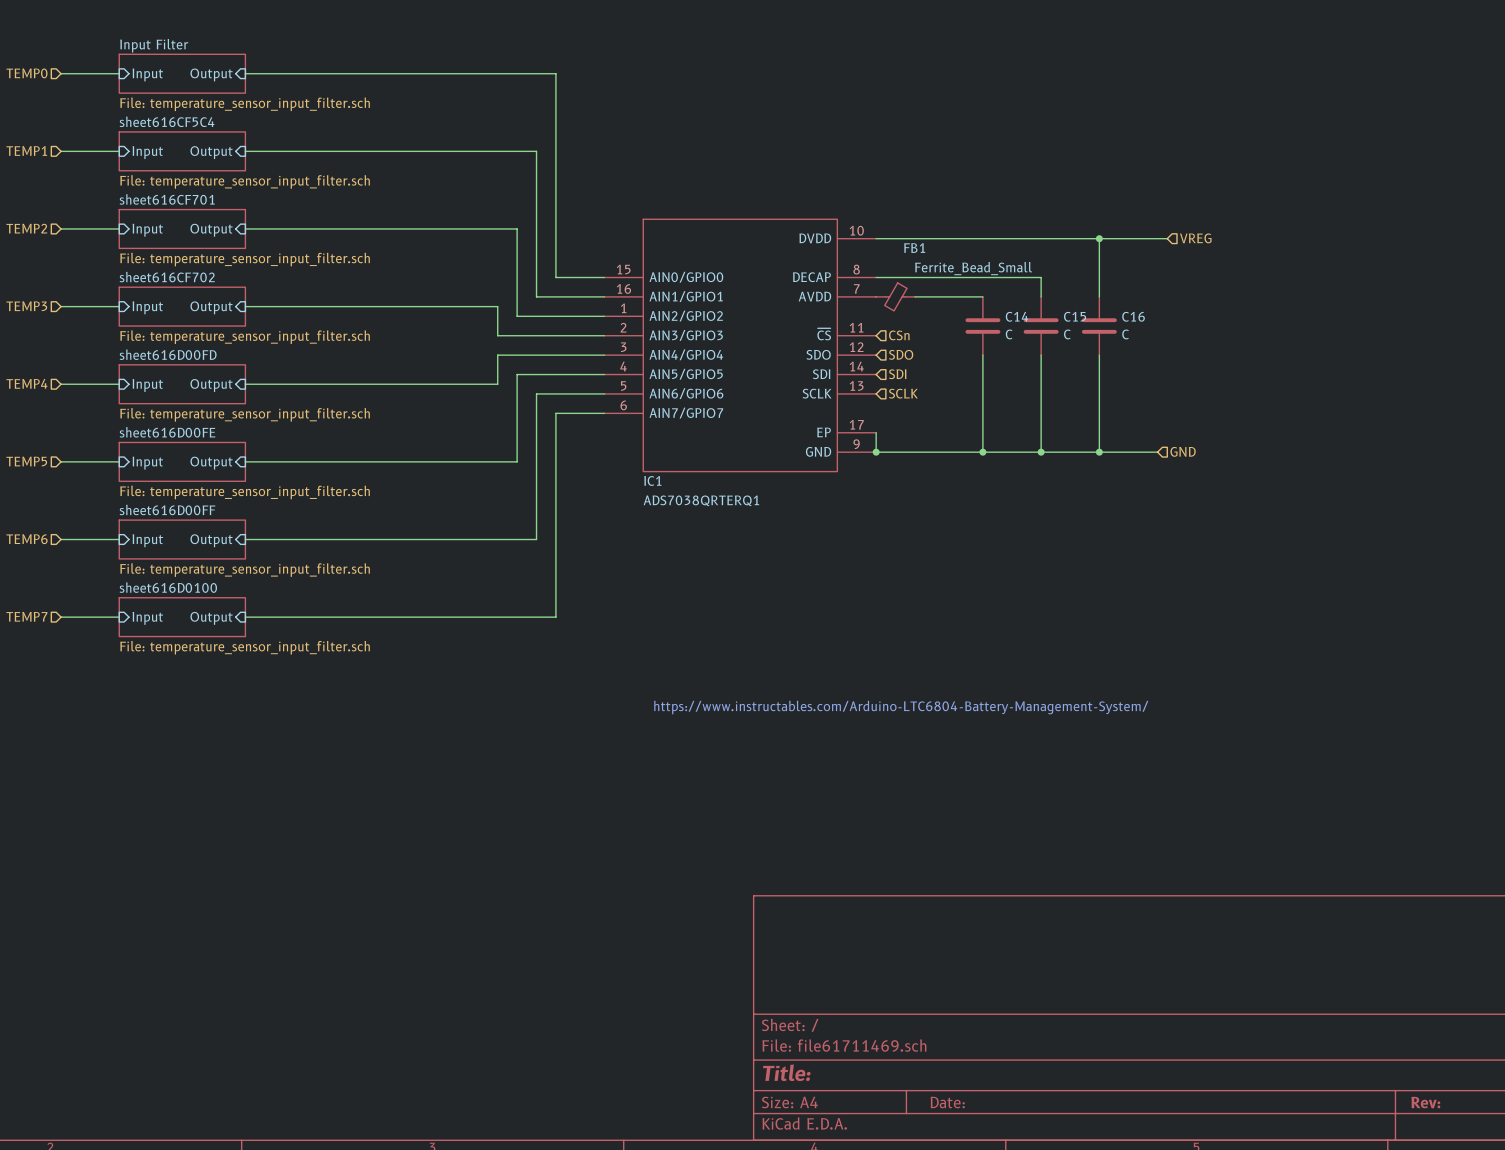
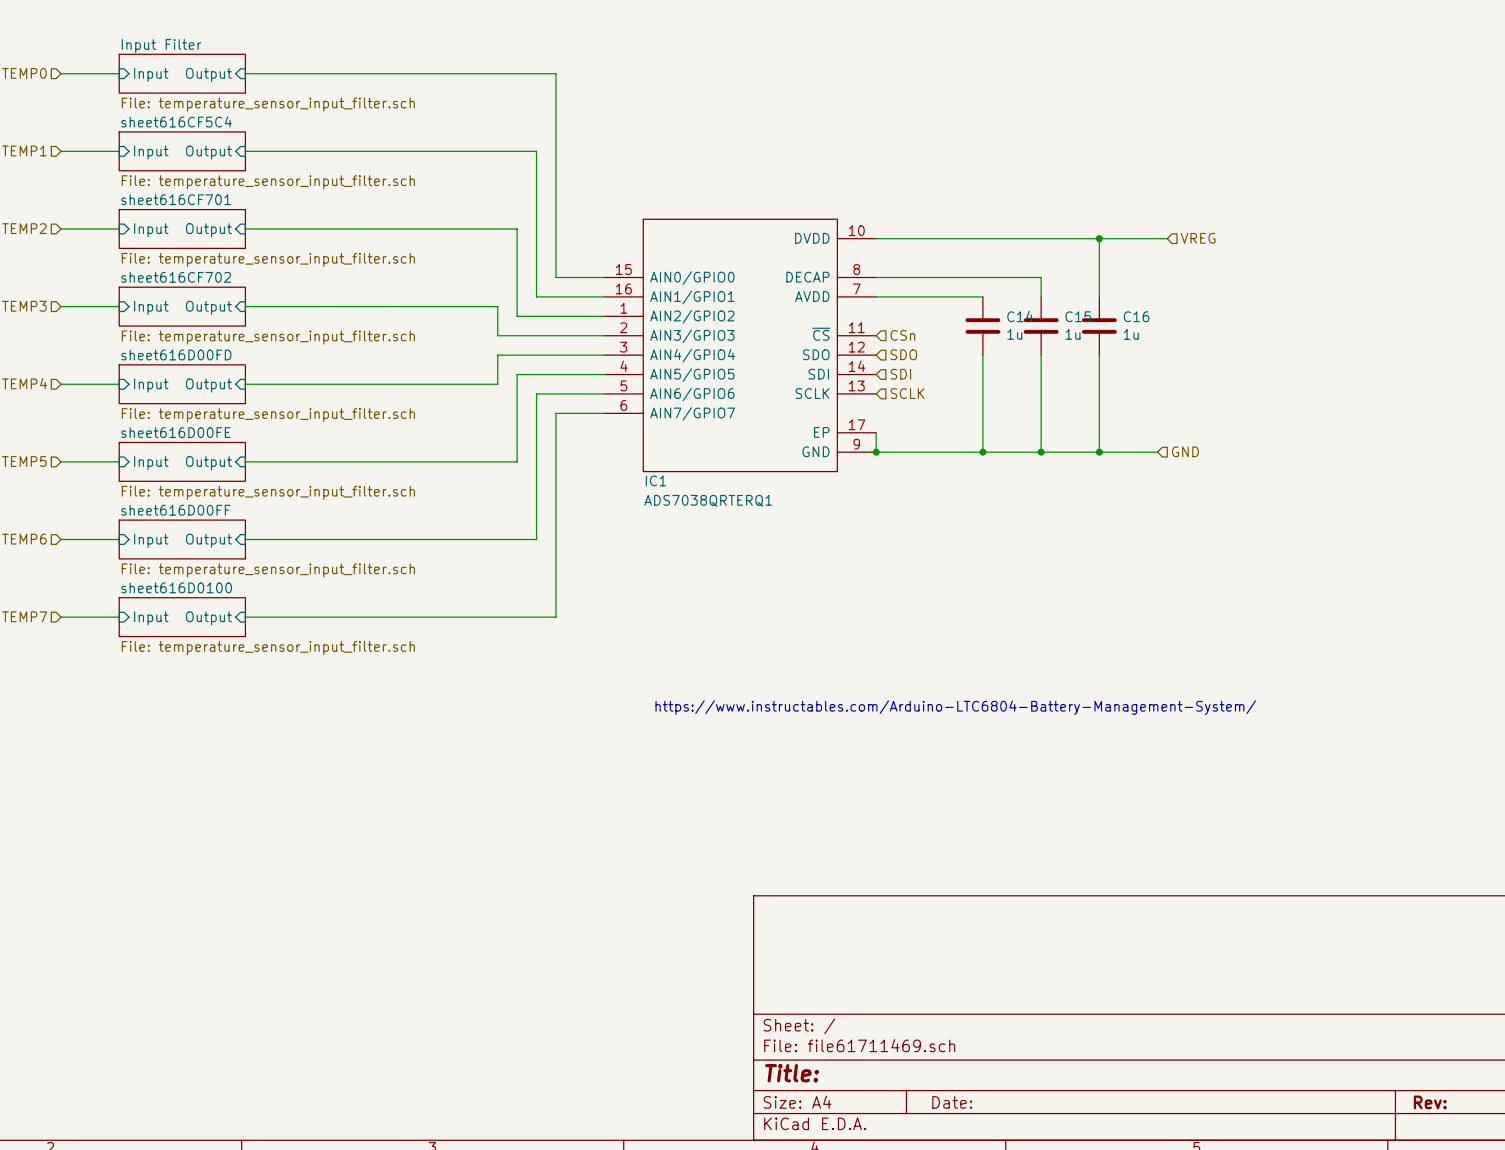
FB1: Ferrite_Bead_Small (895, 296) -> none
C14 value: C (1009, 334) -> 1u (1014, 334)
C15 value: C (1067, 334) -> 1u (1073, 334)
C16 value: C (1125, 334) -> 1u (1131, 334)

